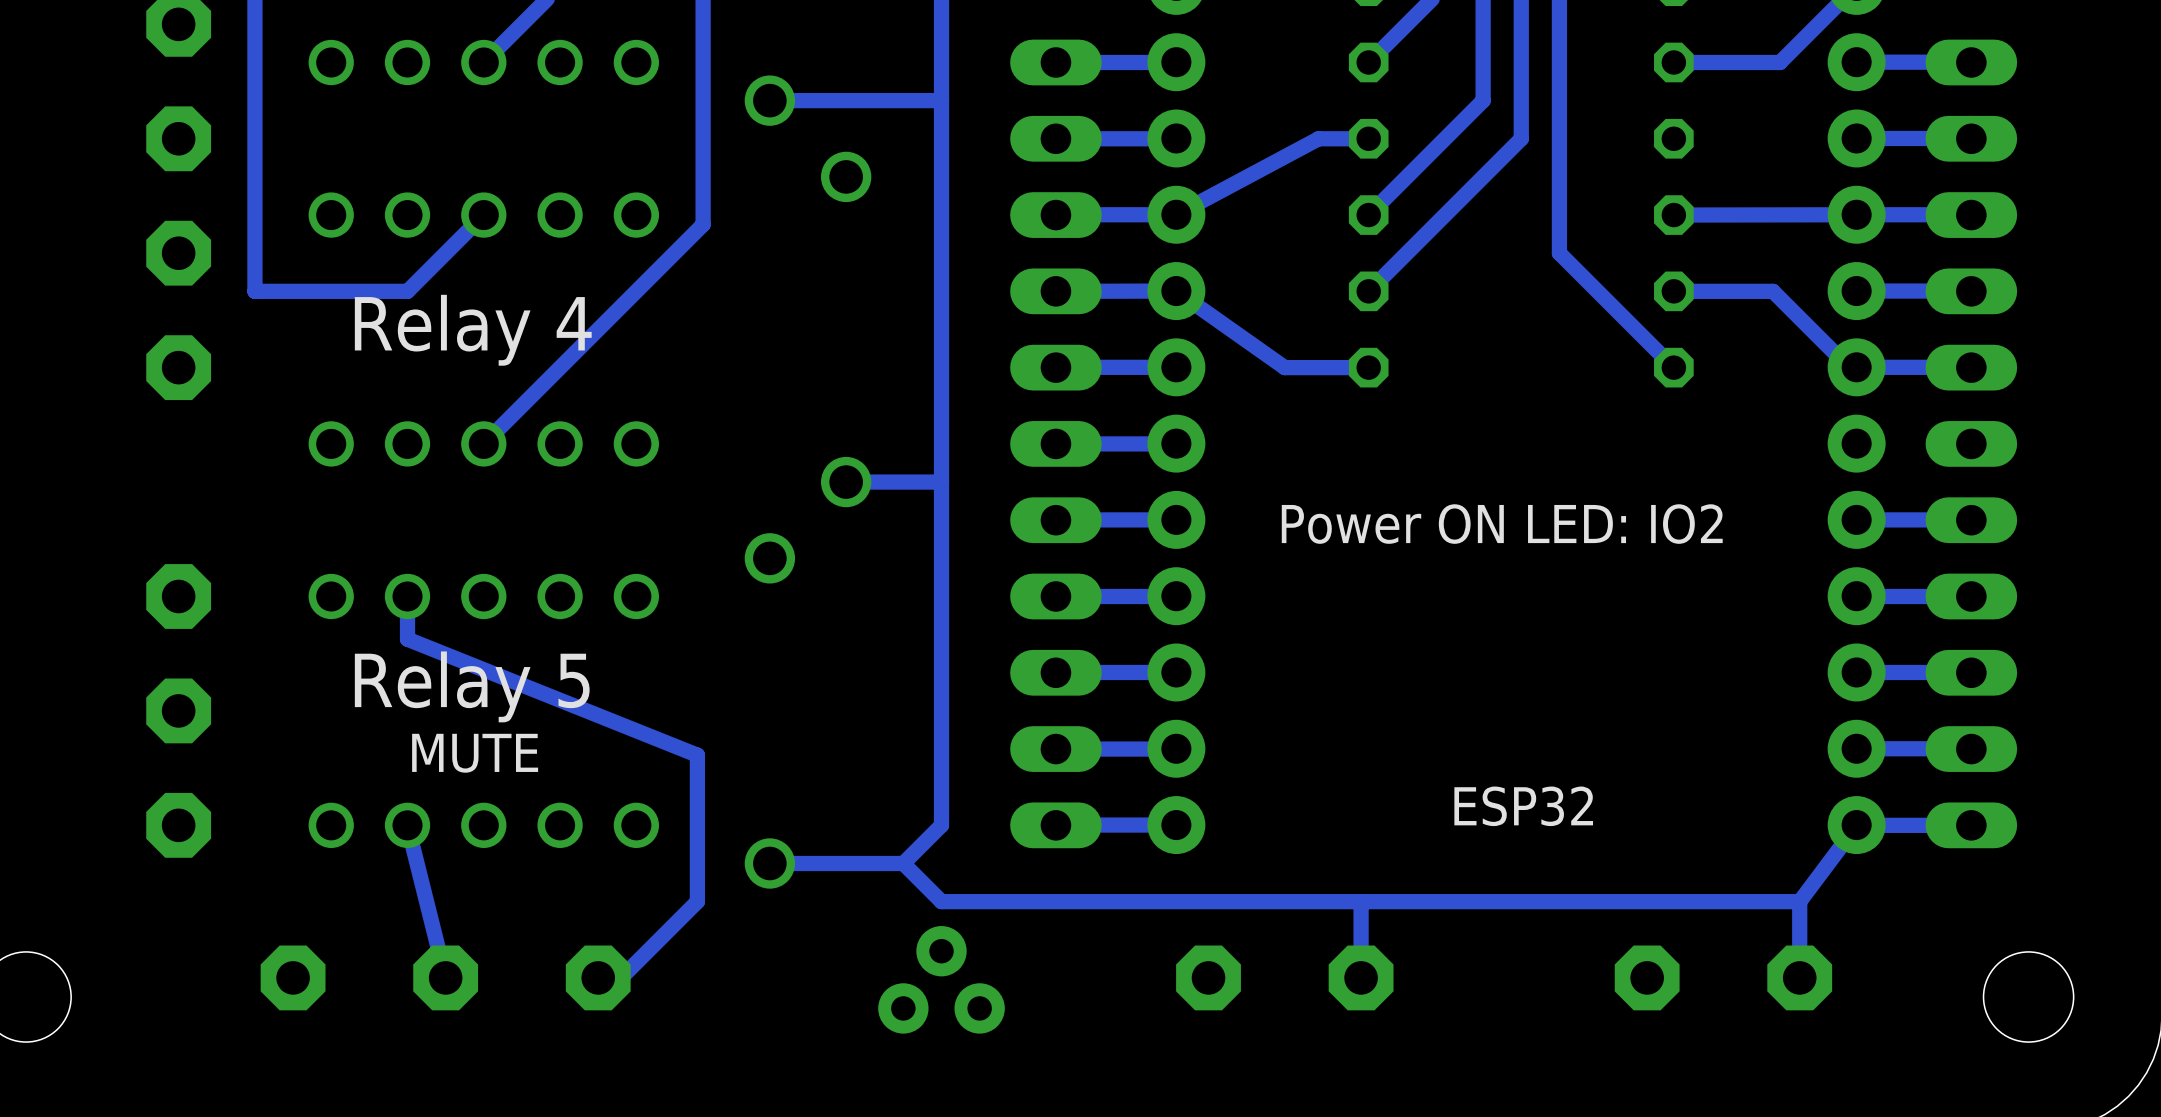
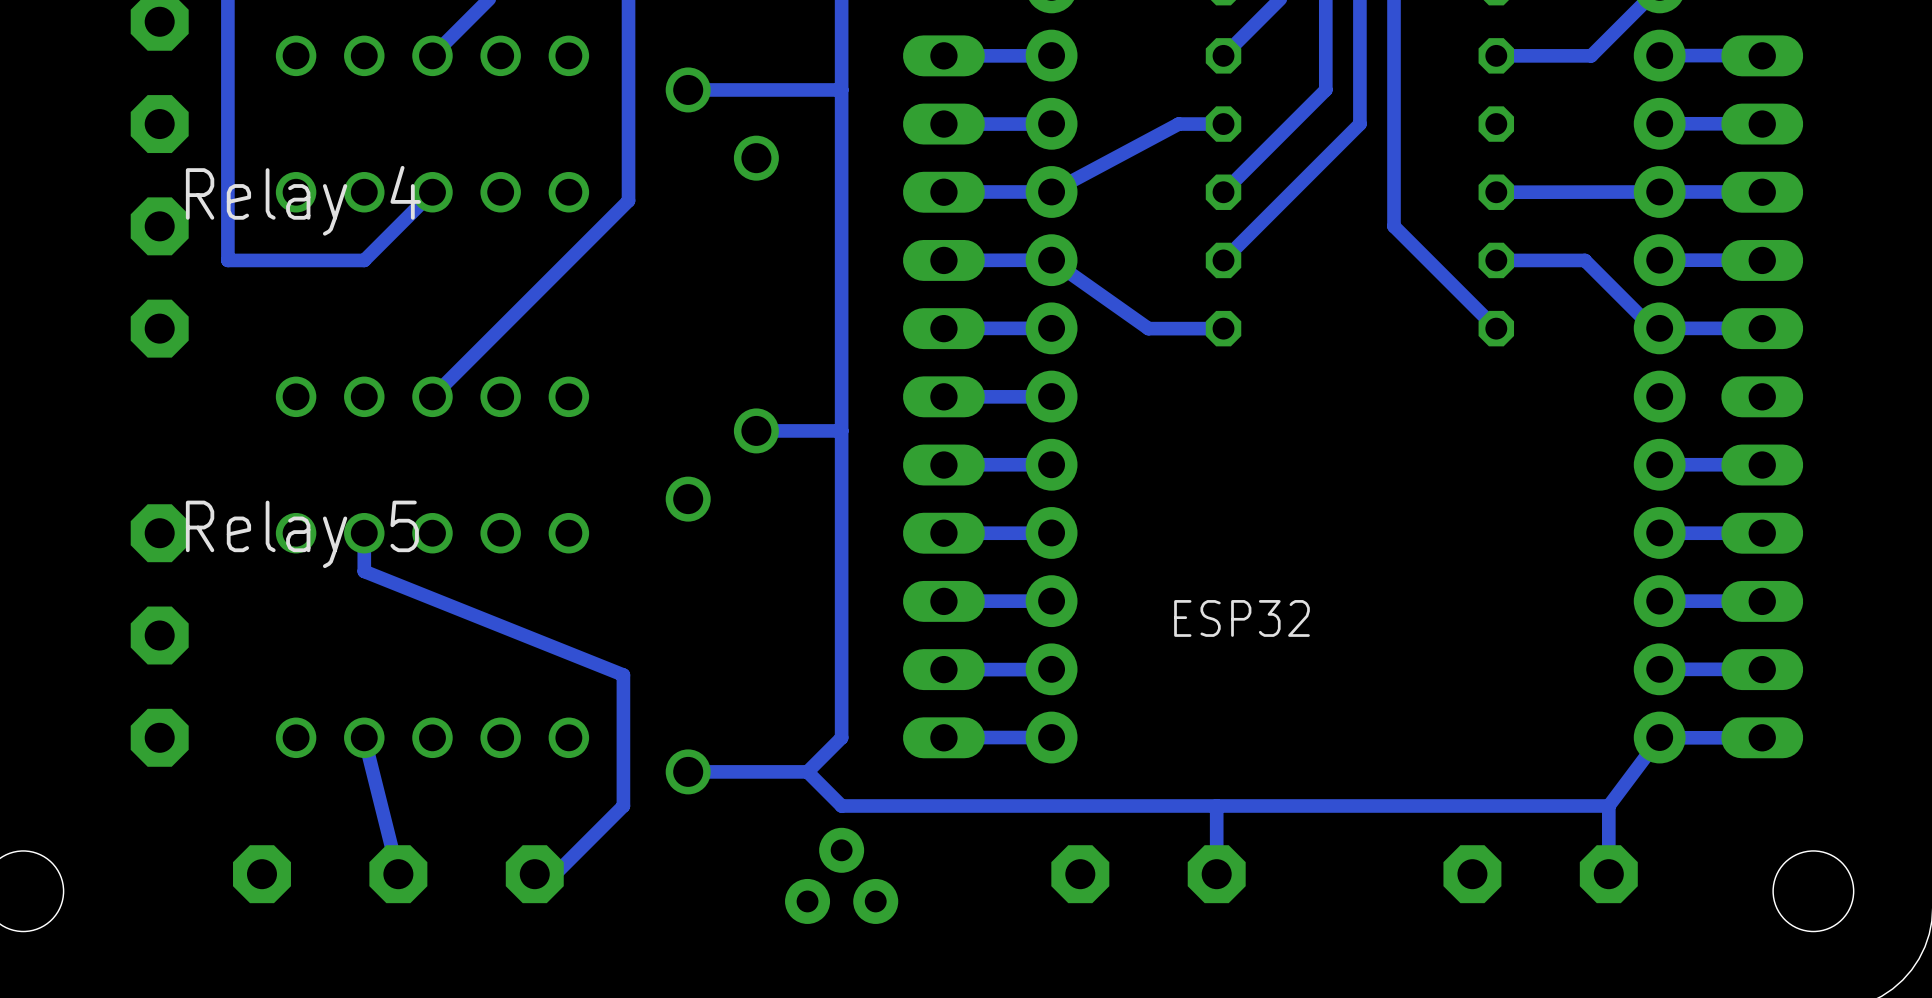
text position: Relay 4 (473, 330) -> Relay 4 (303, 200)
text: Power ON LED: IO2 (1502, 524) -> none
text position: Relay 5 (472, 686) -> Relay 5 (302, 534)
text: MUTE (475, 753) -> none
text position: ESP32 (1523, 806) -> ESP32 (1242, 618)

